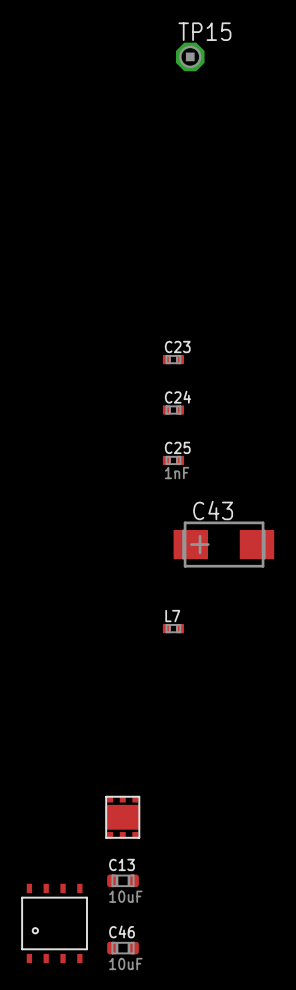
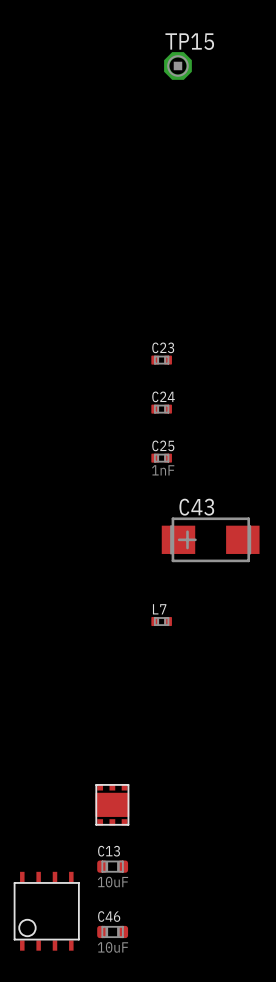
part footprint: [21, 883, 88, 964] -> [13, 871, 80, 951]

